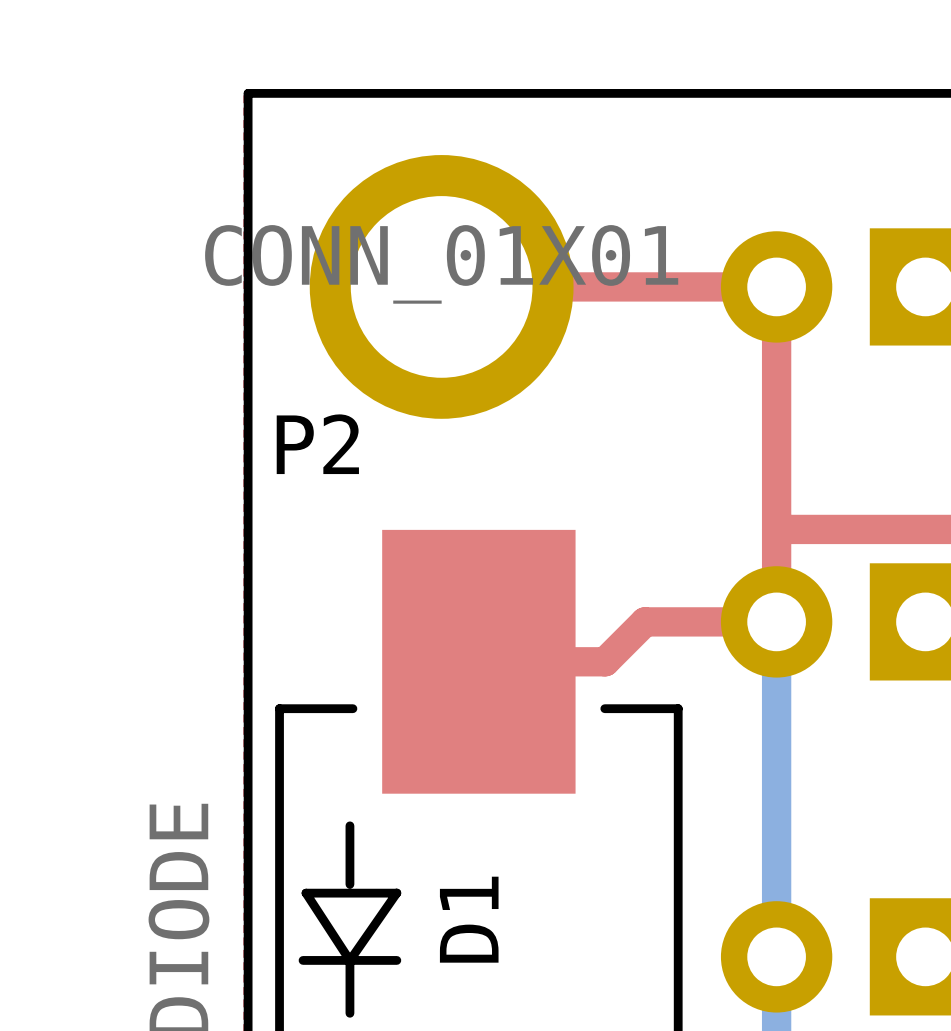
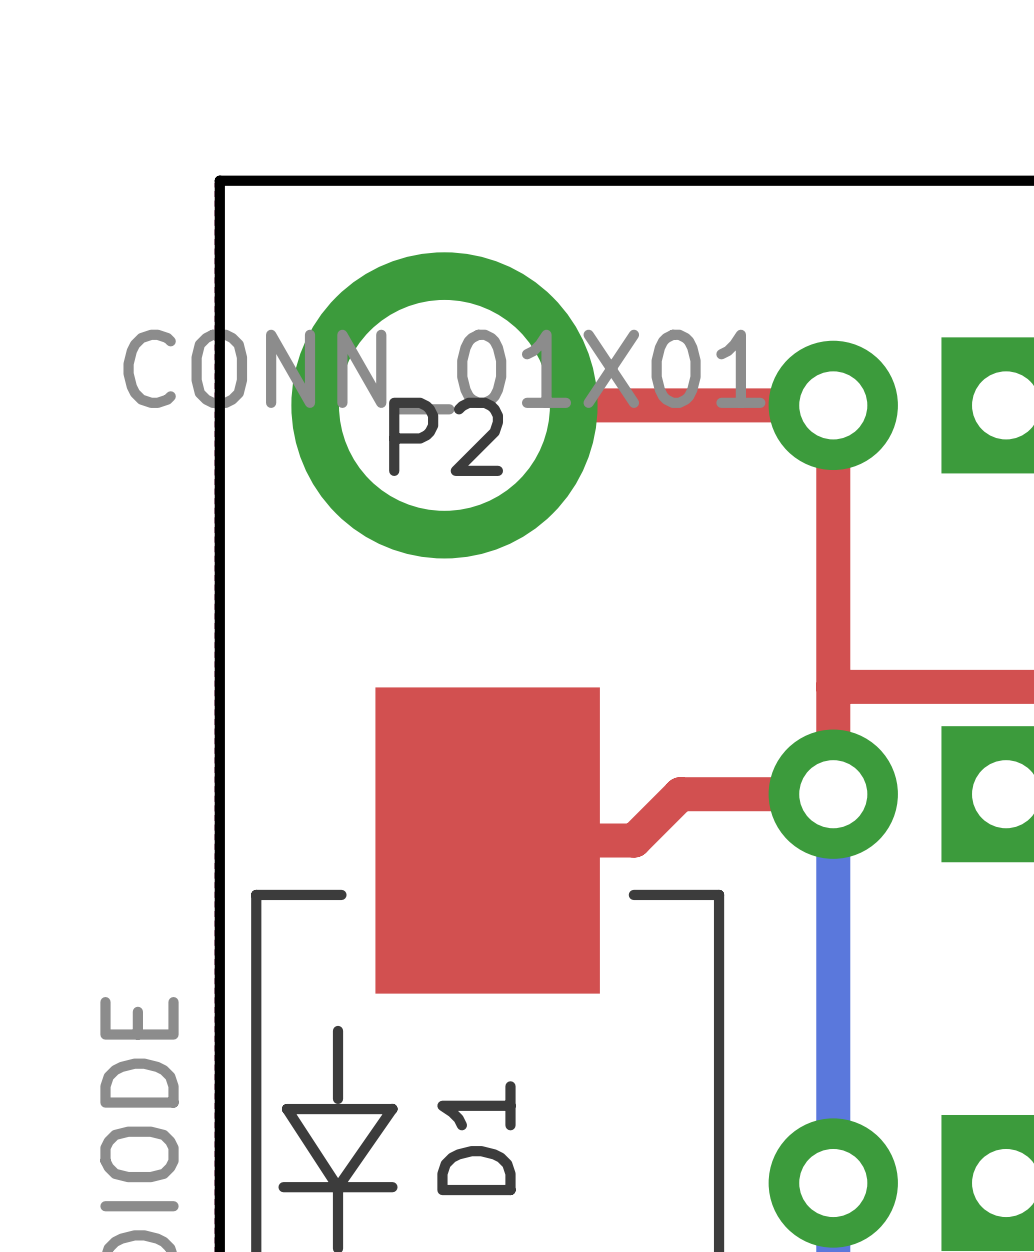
P2 name position: P2 (317, 444) -> P2 (446, 436)

